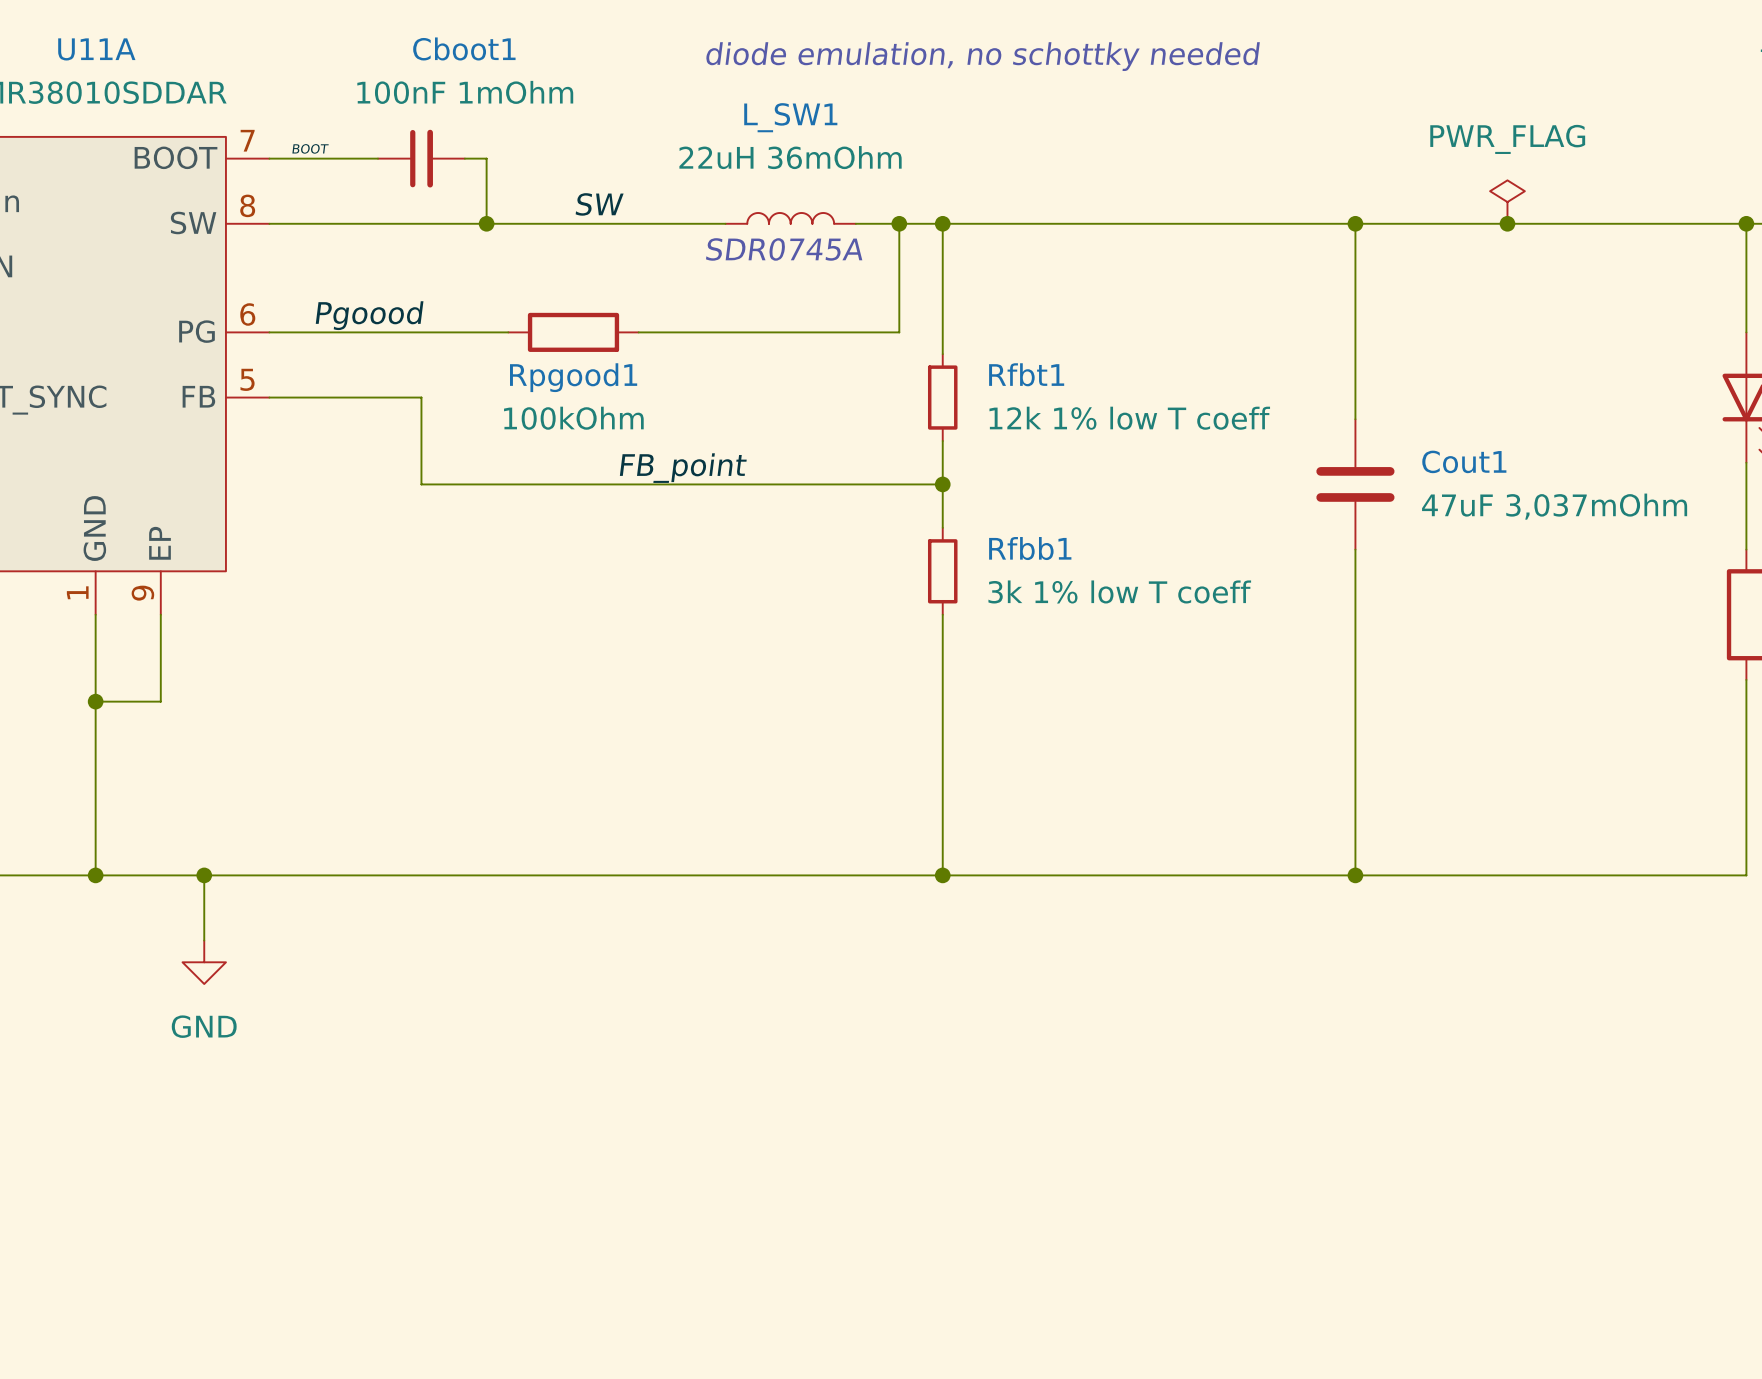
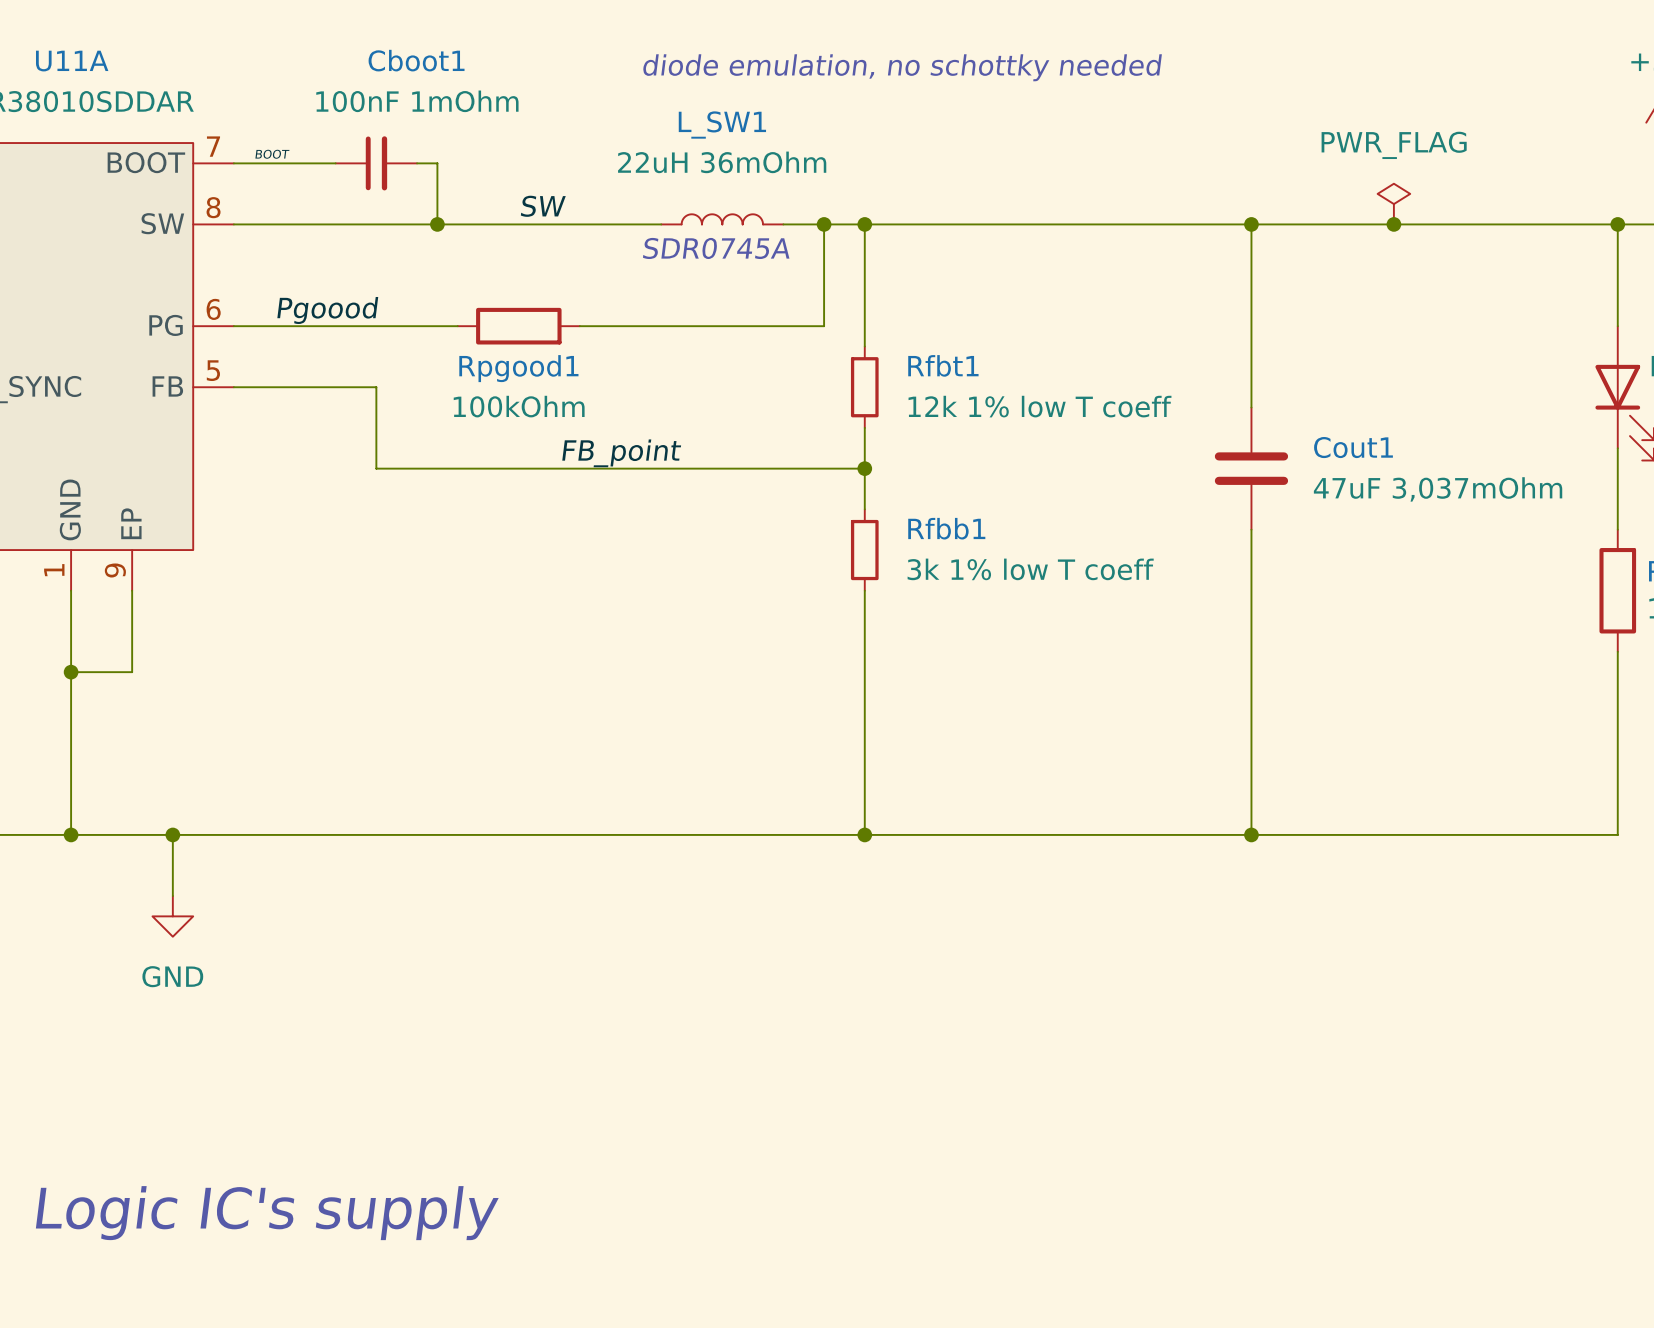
text: none -> Logic IC's supply (267, 1213)

